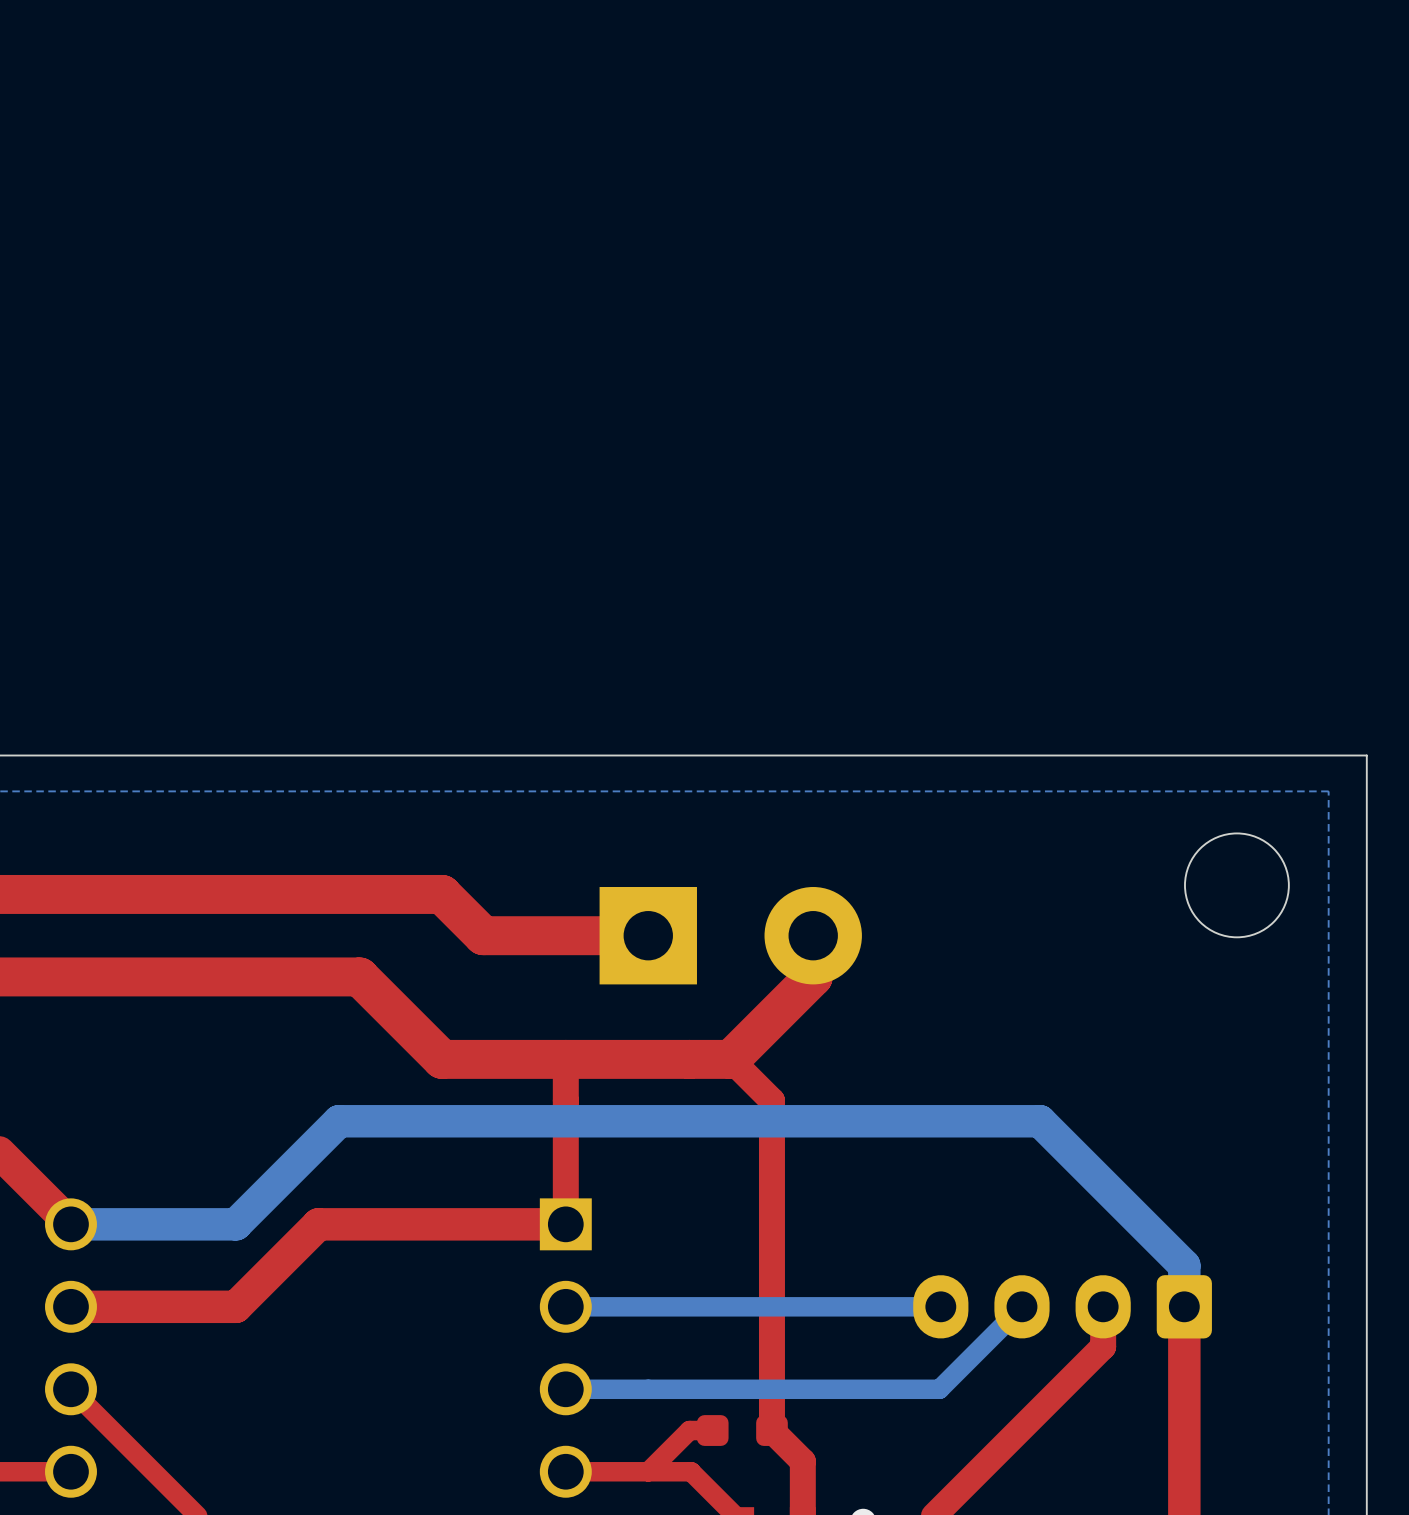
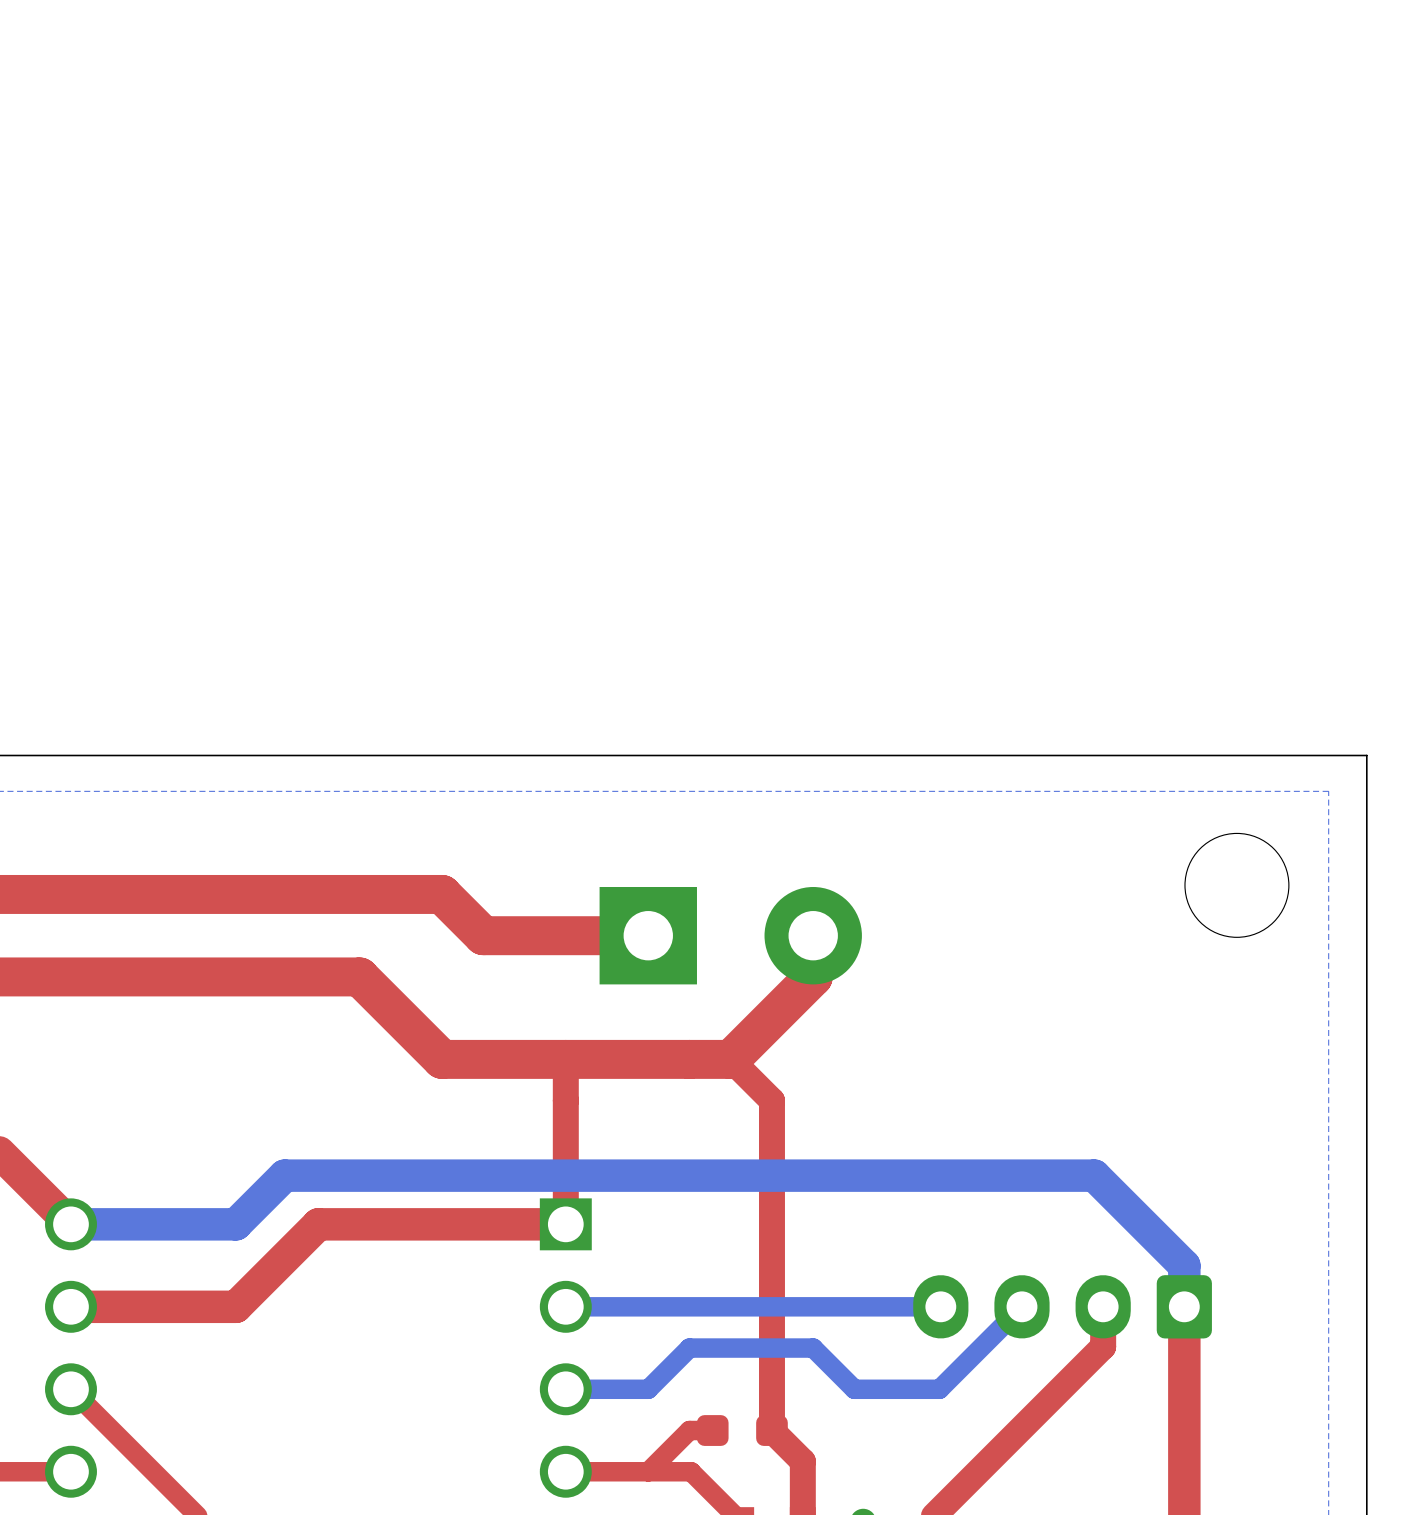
bottom track: (1094, 1175) (1040, 1121) (339, 1121) (284, 1175) -> (1094, 1175) (284, 1175)
bottom track: (854, 1389) (648, 1389) -> (854, 1389) (813, 1348) (689, 1348) (648, 1389)

